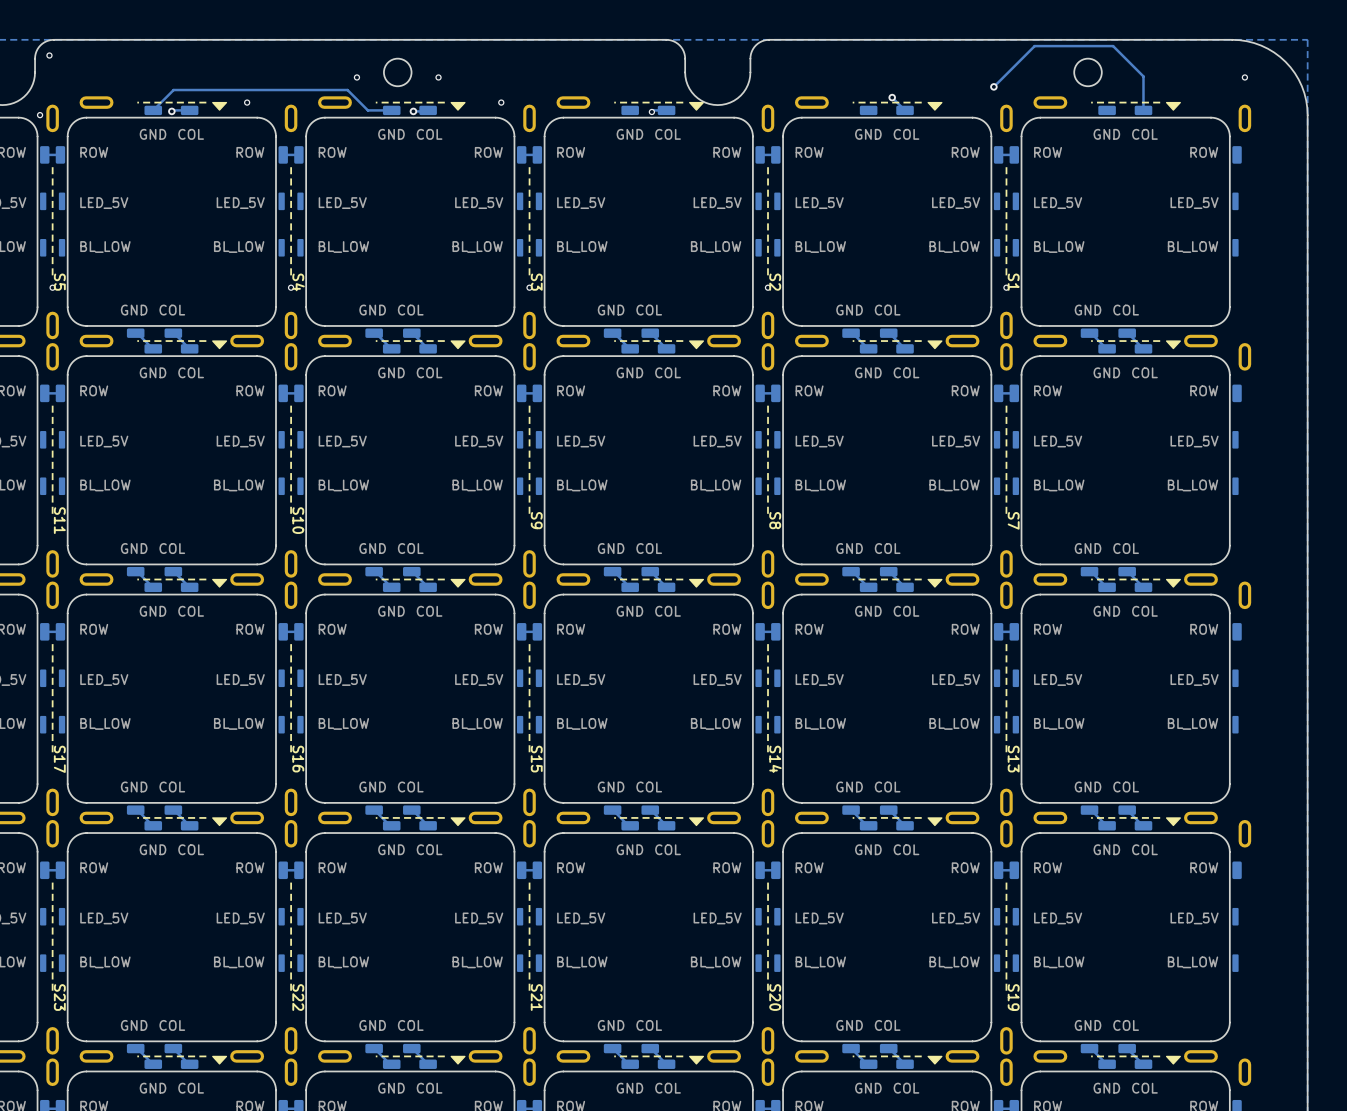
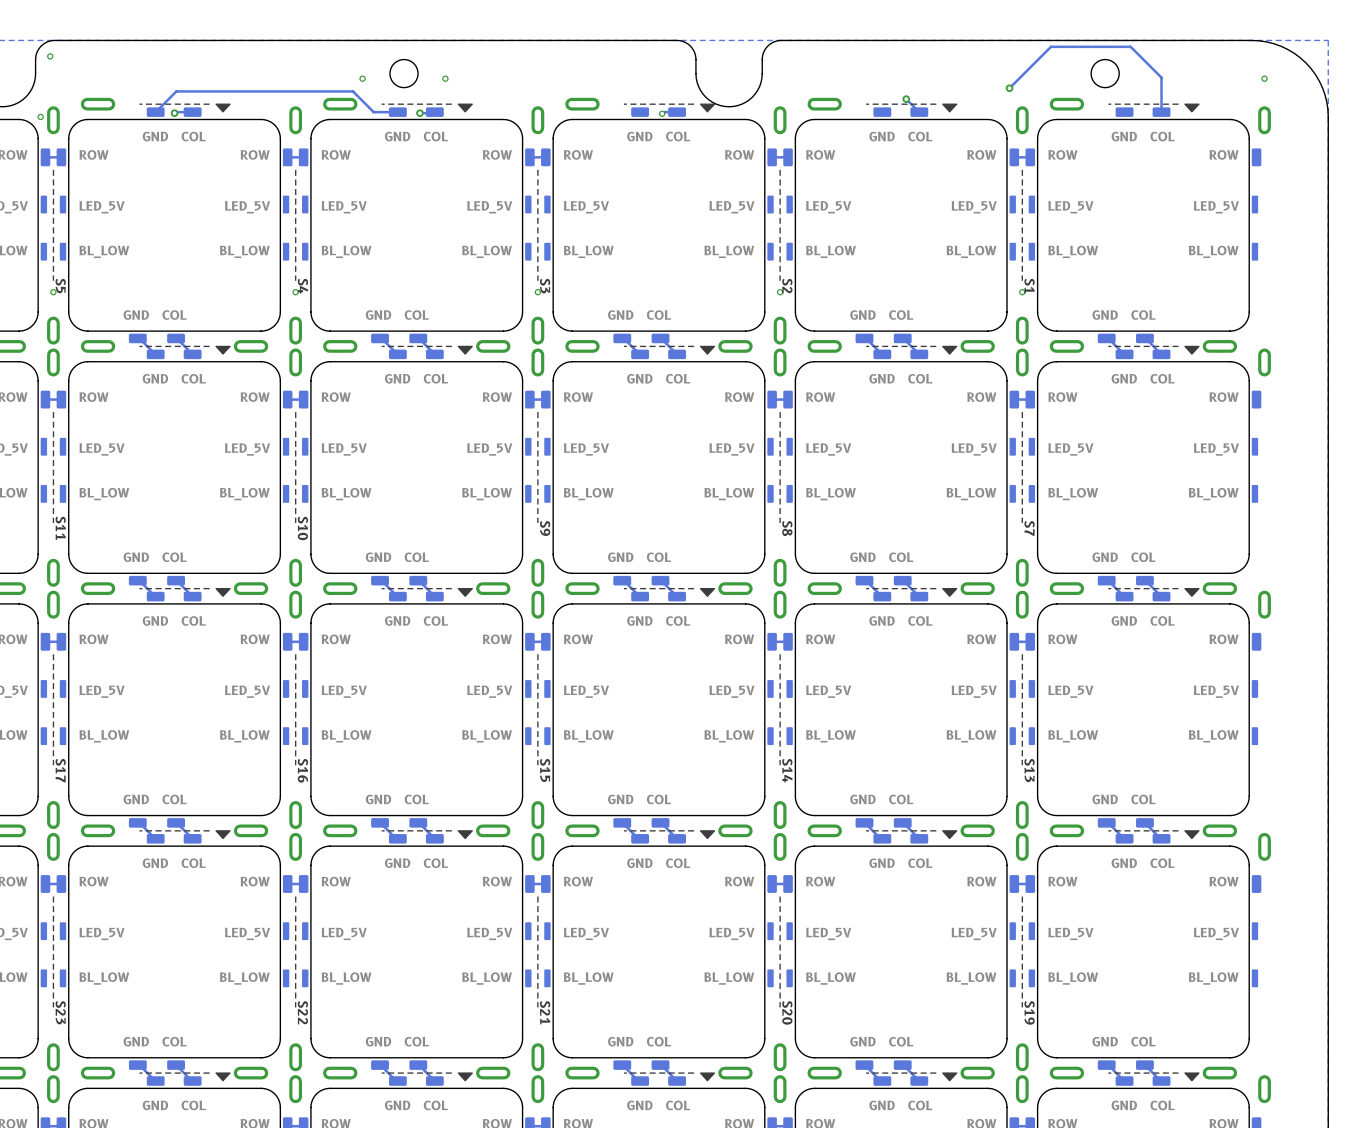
via: (247, 102) -> none
via: (501, 102) -> none

